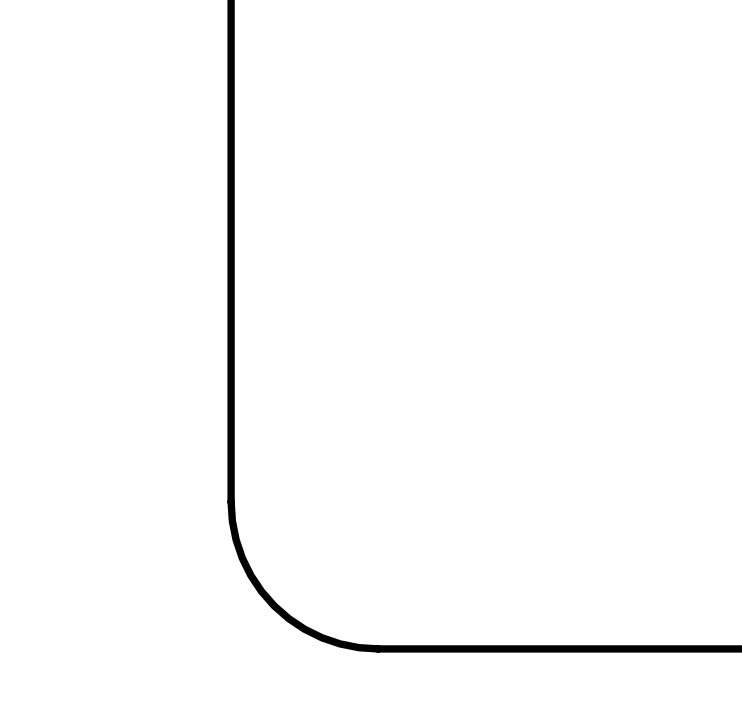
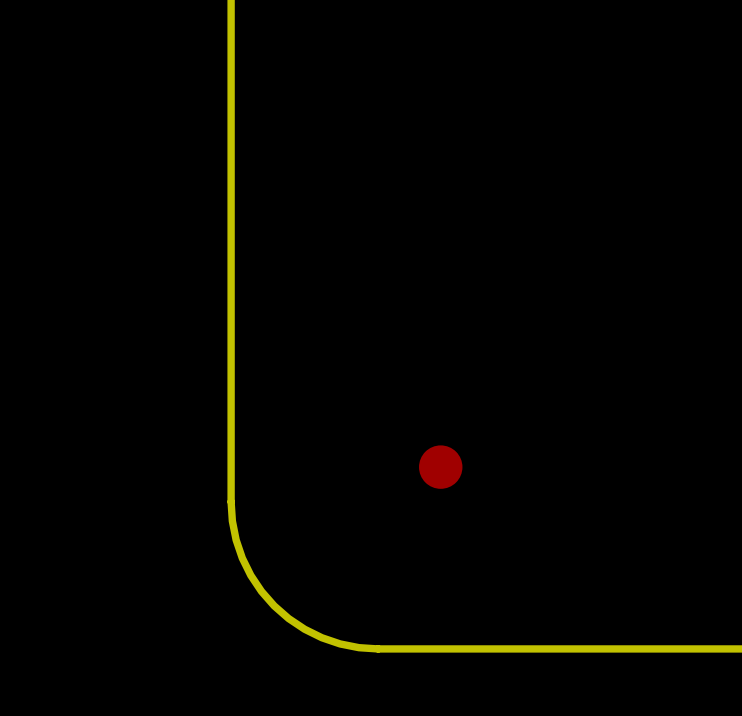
part: none -> (440, 467)

